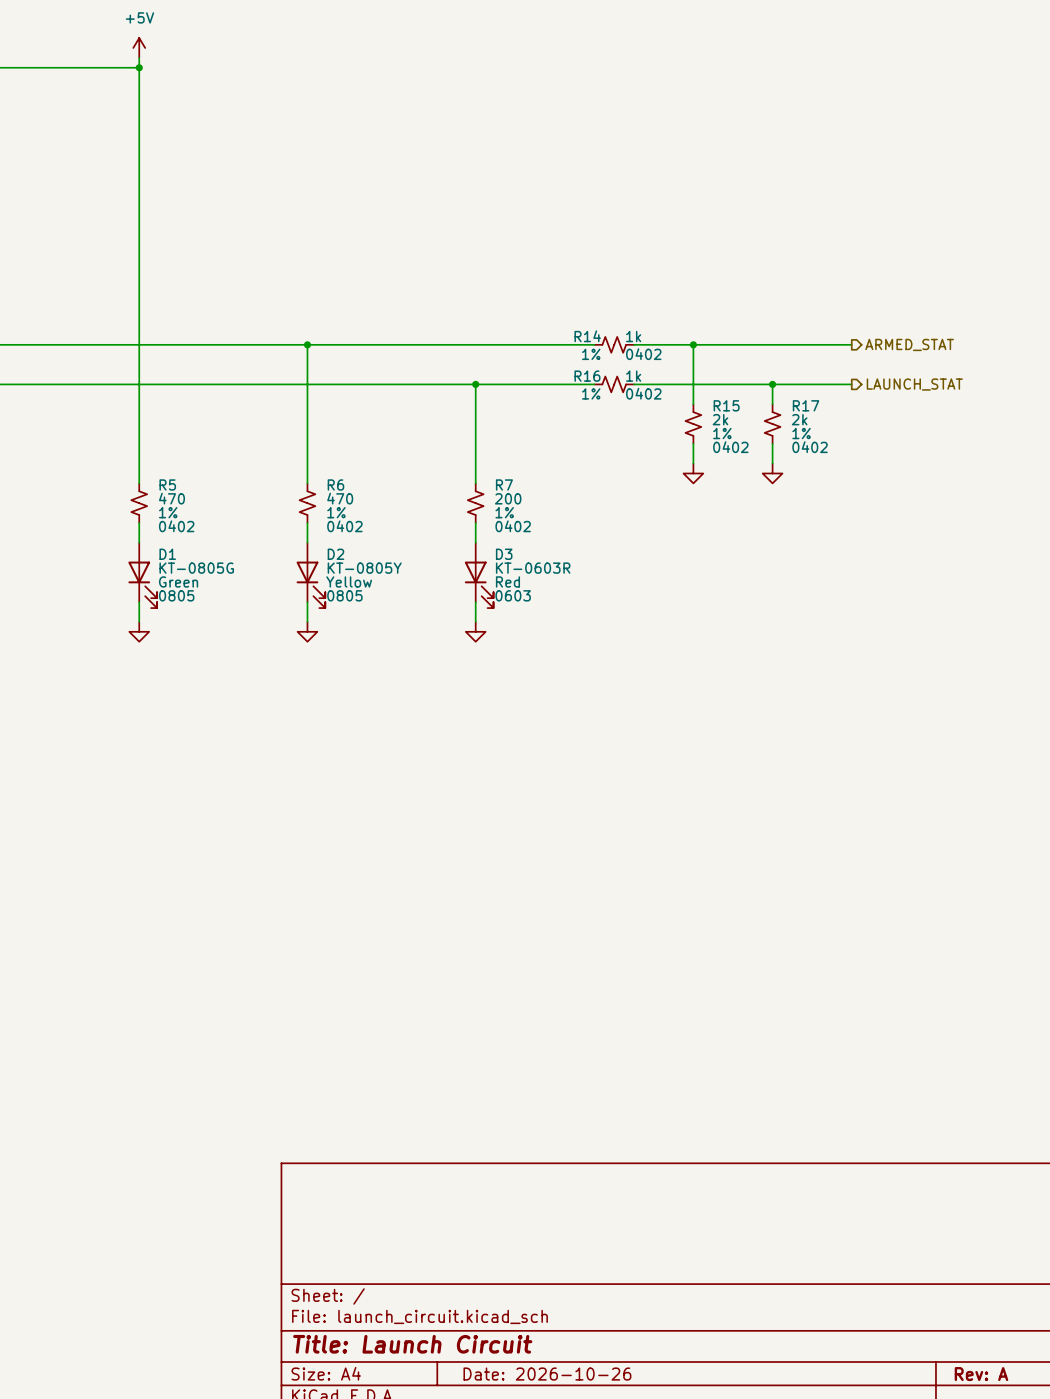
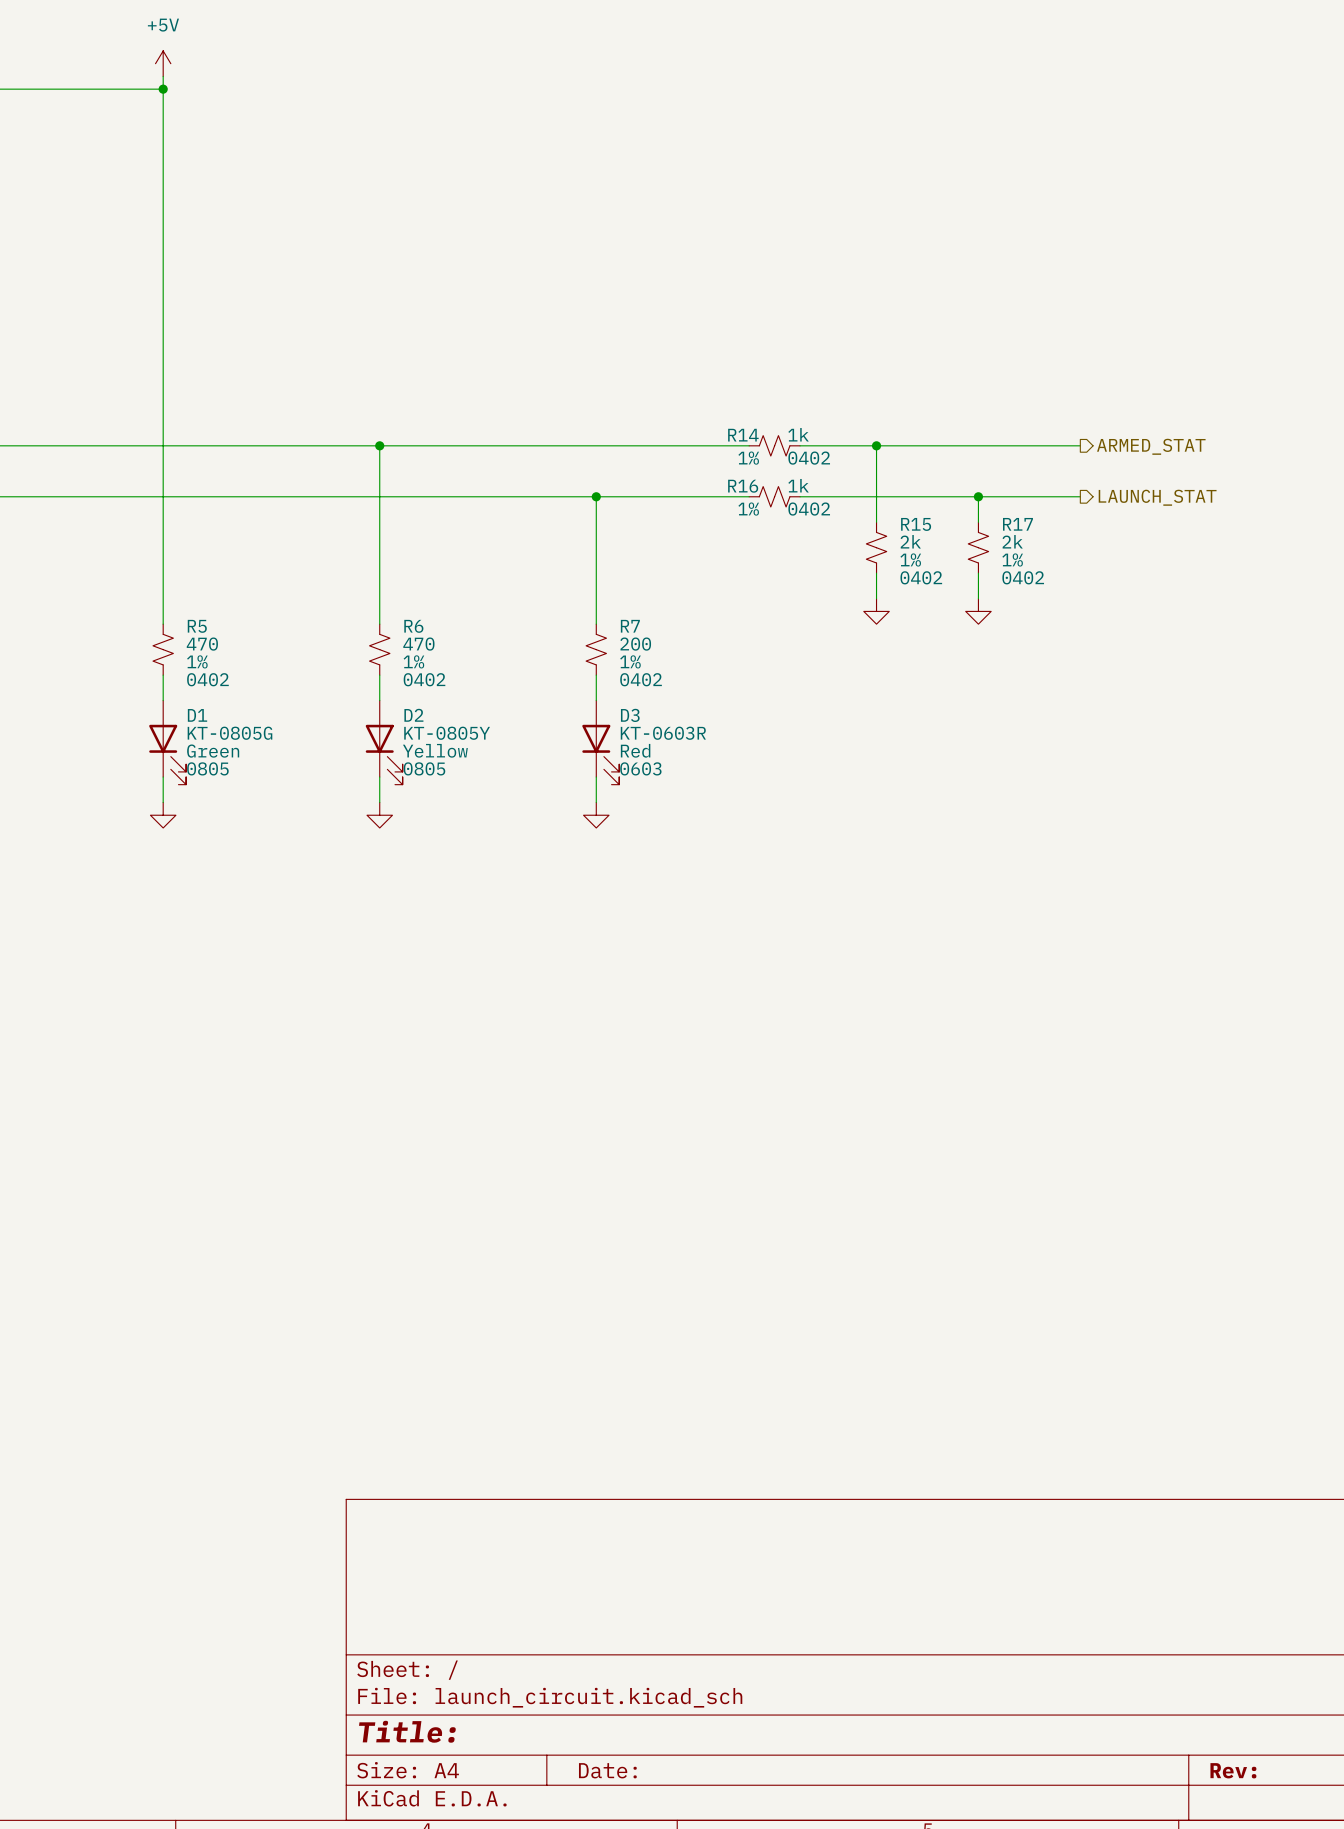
title block: Title: Launch Circuit (412, 1344) -> Title: (407, 1731)
title block: Date: 2026-10-26 (547, 1374) -> Date: (607, 1770)
title block: Rev: A (981, 1374) -> Rev: (1233, 1770)

